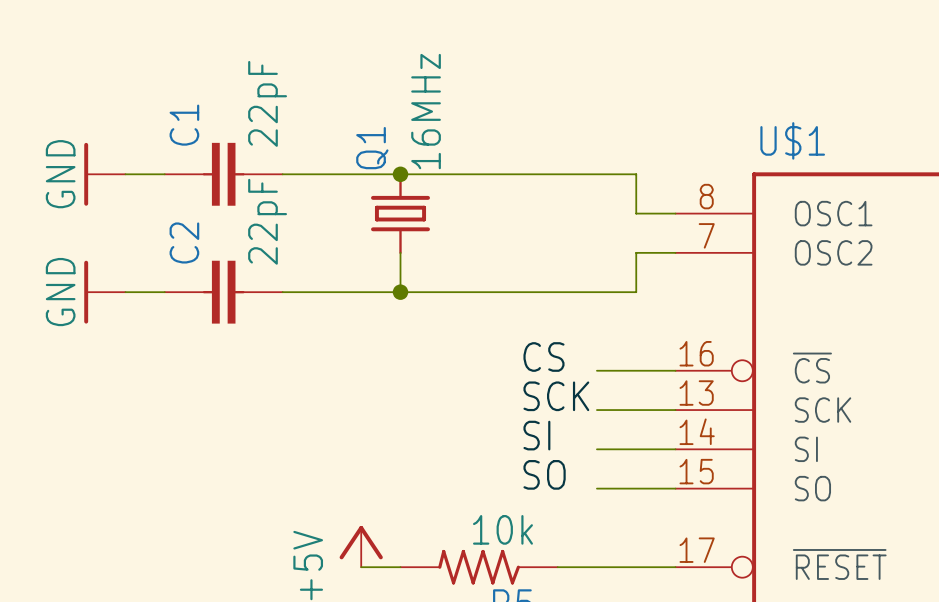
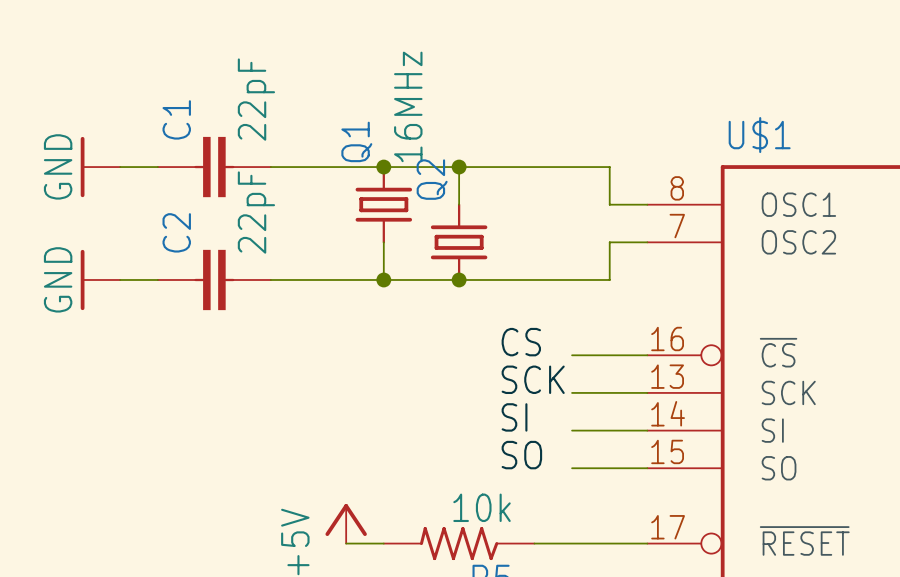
wire: none -> (459, 167) (459, 204)
junction: none -> (459, 167)
Q2: none -> (459, 242)
junction: none -> (459, 279)

